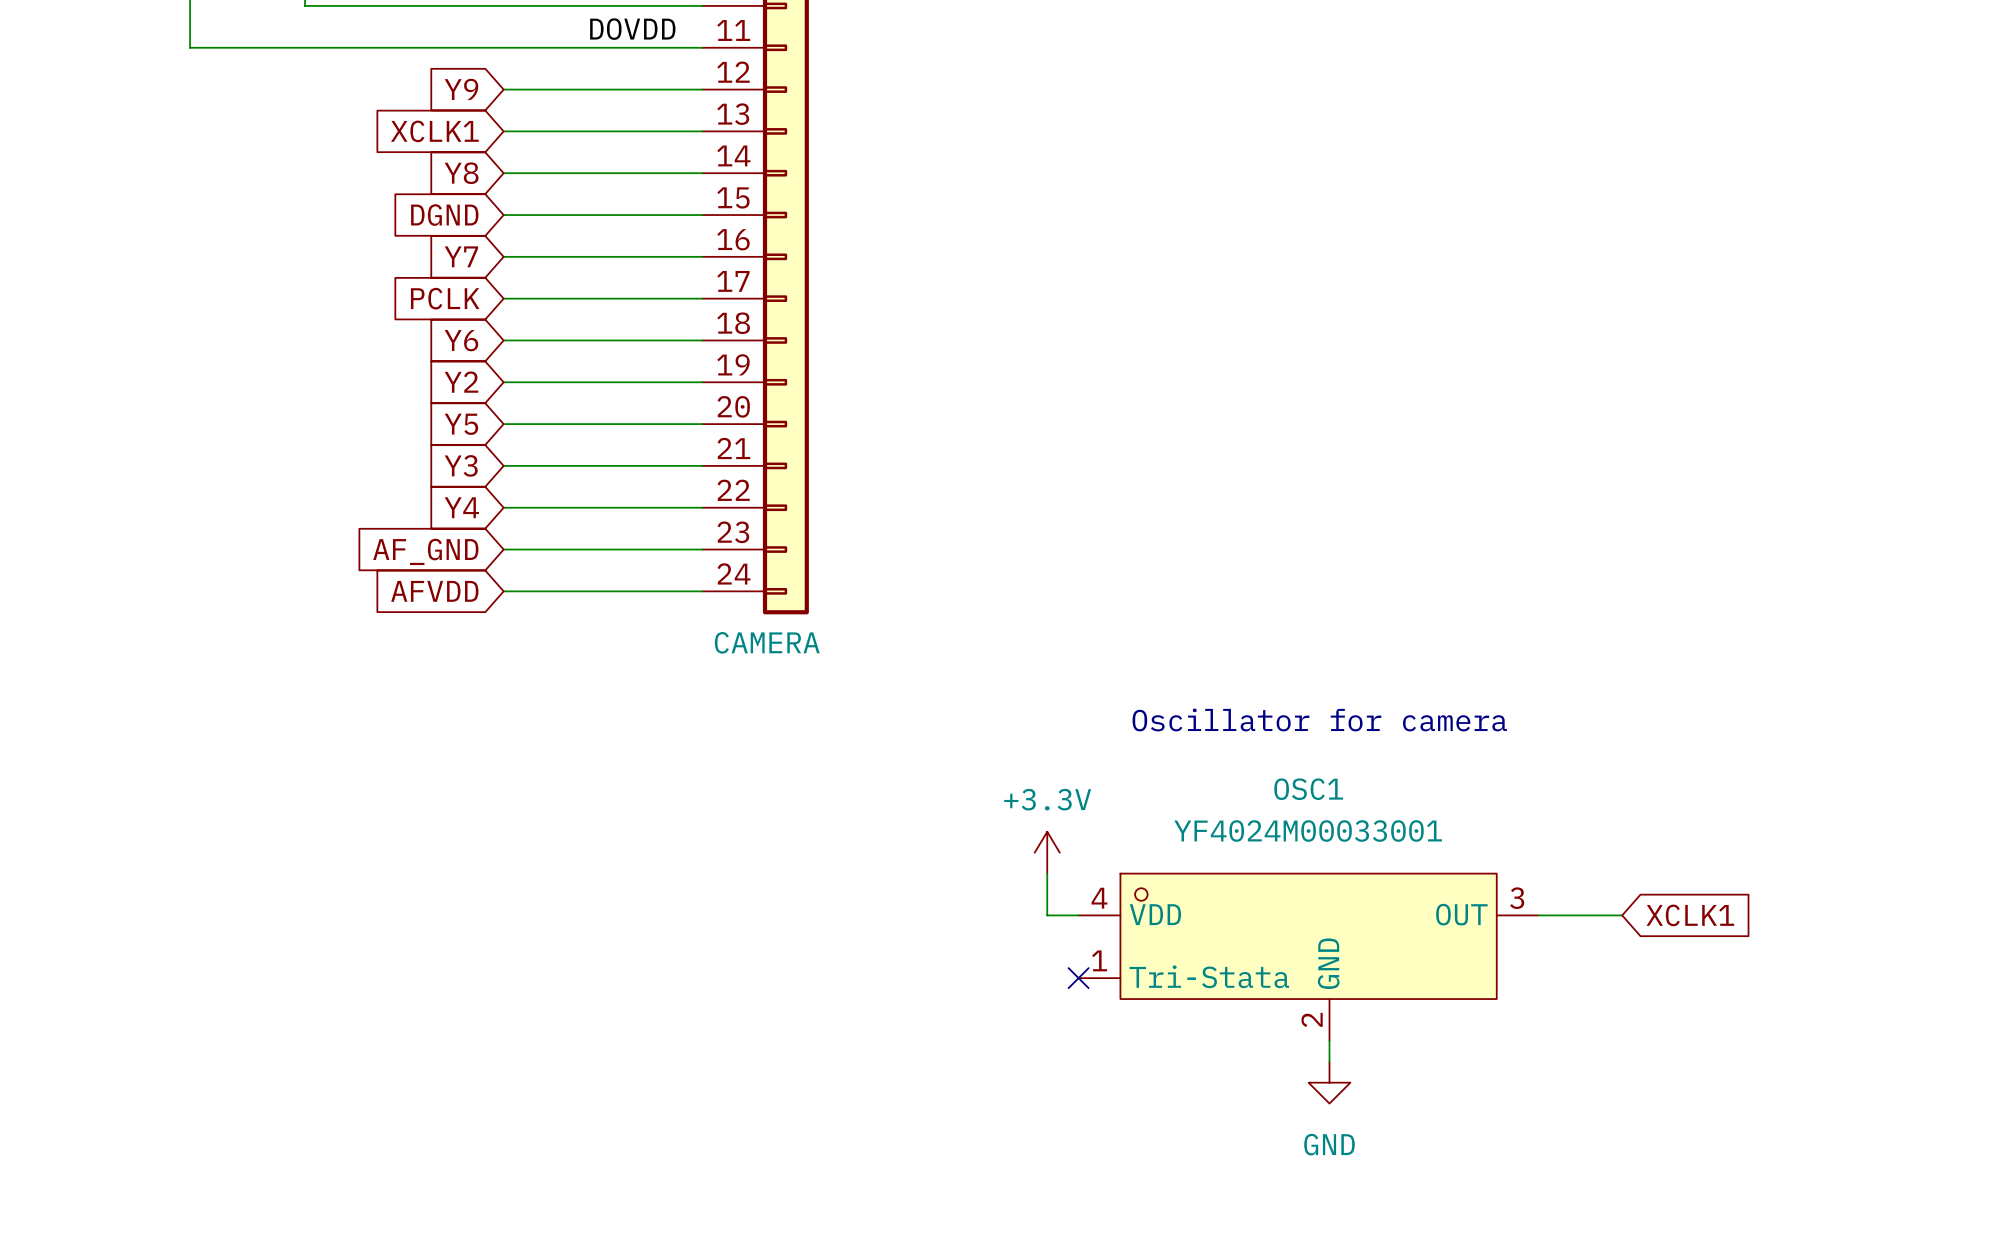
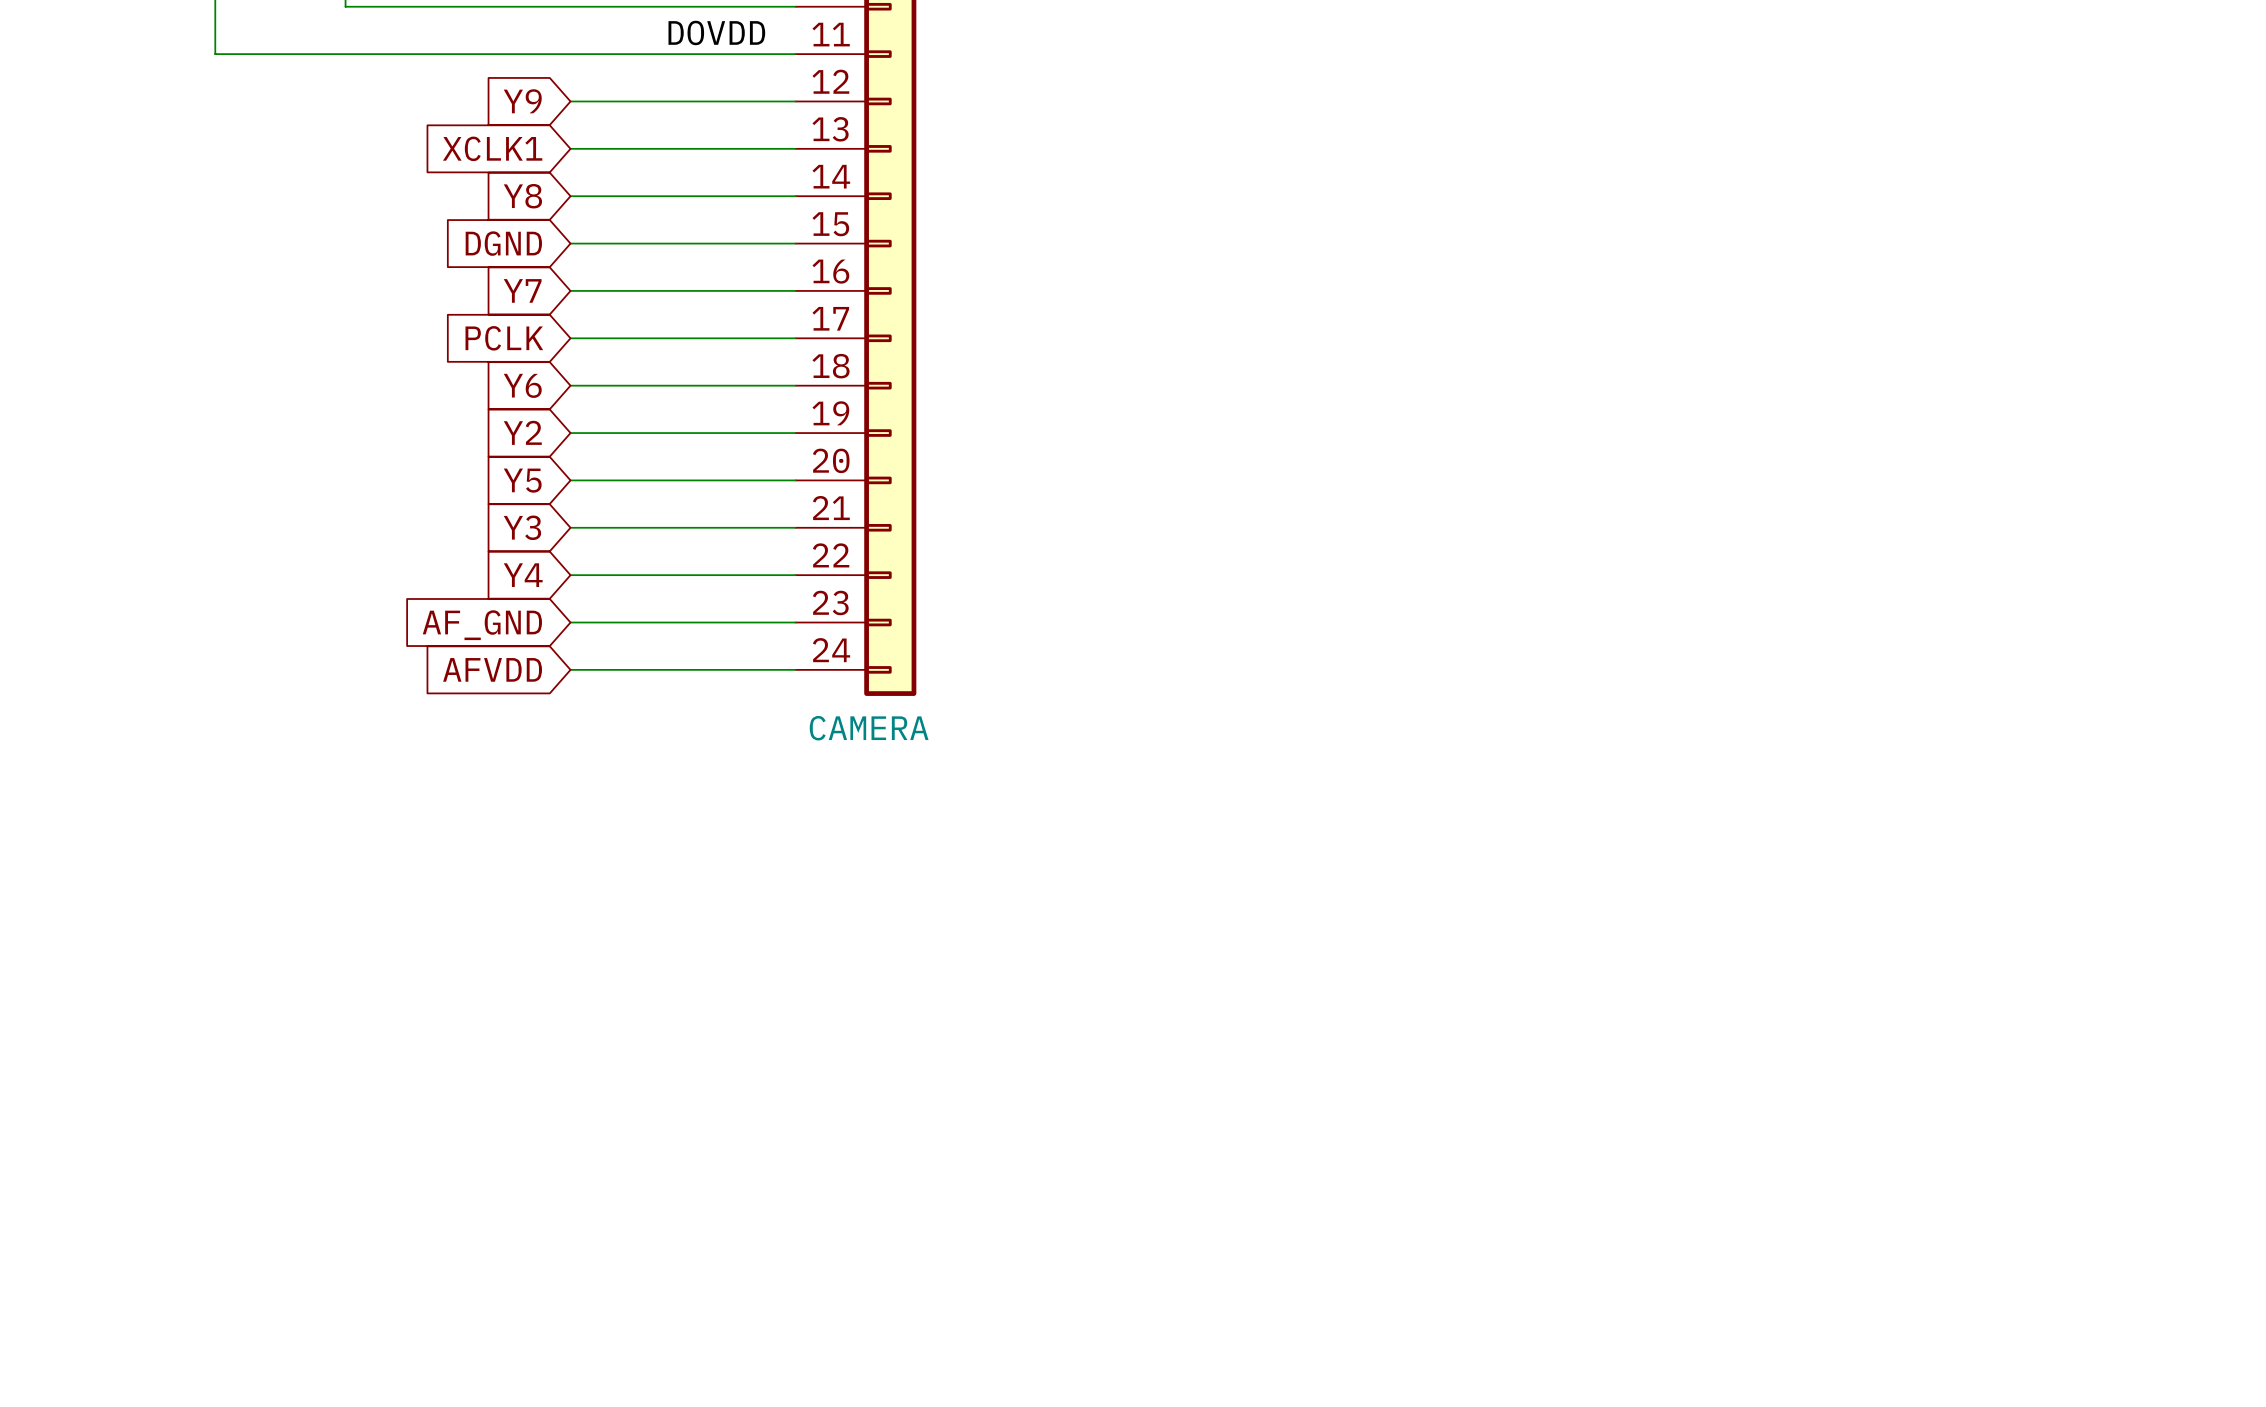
text: Oscillator for camera (1319, 720) -> none
power symbol: +3.3V (1047, 852) -> none
wire: (1047, 873) (1047, 915) (1078, 915) -> none
wire: (1538, 915) (1622, 915) -> none
global label: XCLK1 (1690, 915) -> none
OSC1: YF4024M00033001 (1308, 957) -> none
no-connect mark: (1078, 978) -> none
wire: (1329, 1040) (1329, 1061) -> none
power symbol: GND (1329, 1082) -> none

